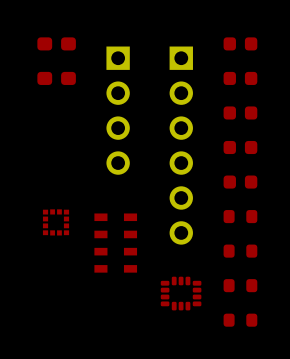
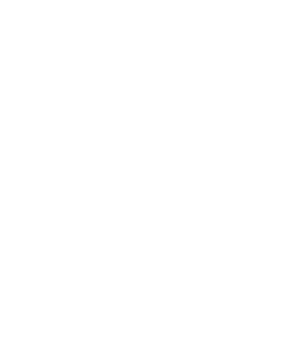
part: (56, 43) -> none
part: (240, 43) -> none
part: (56, 78) -> none
part: (240, 78) -> none
part: (118, 110) -> none
part: (240, 112) -> none
part: (181, 145) -> none
part: (240, 147) -> none
part: (240, 182) -> none
part: (240, 216) -> none
part: (56, 222) -> none
part: (115, 243) -> none
part: (240, 251) -> none
part: (240, 285) -> none
part: (181, 293) -> none
part: (240, 320) -> none

